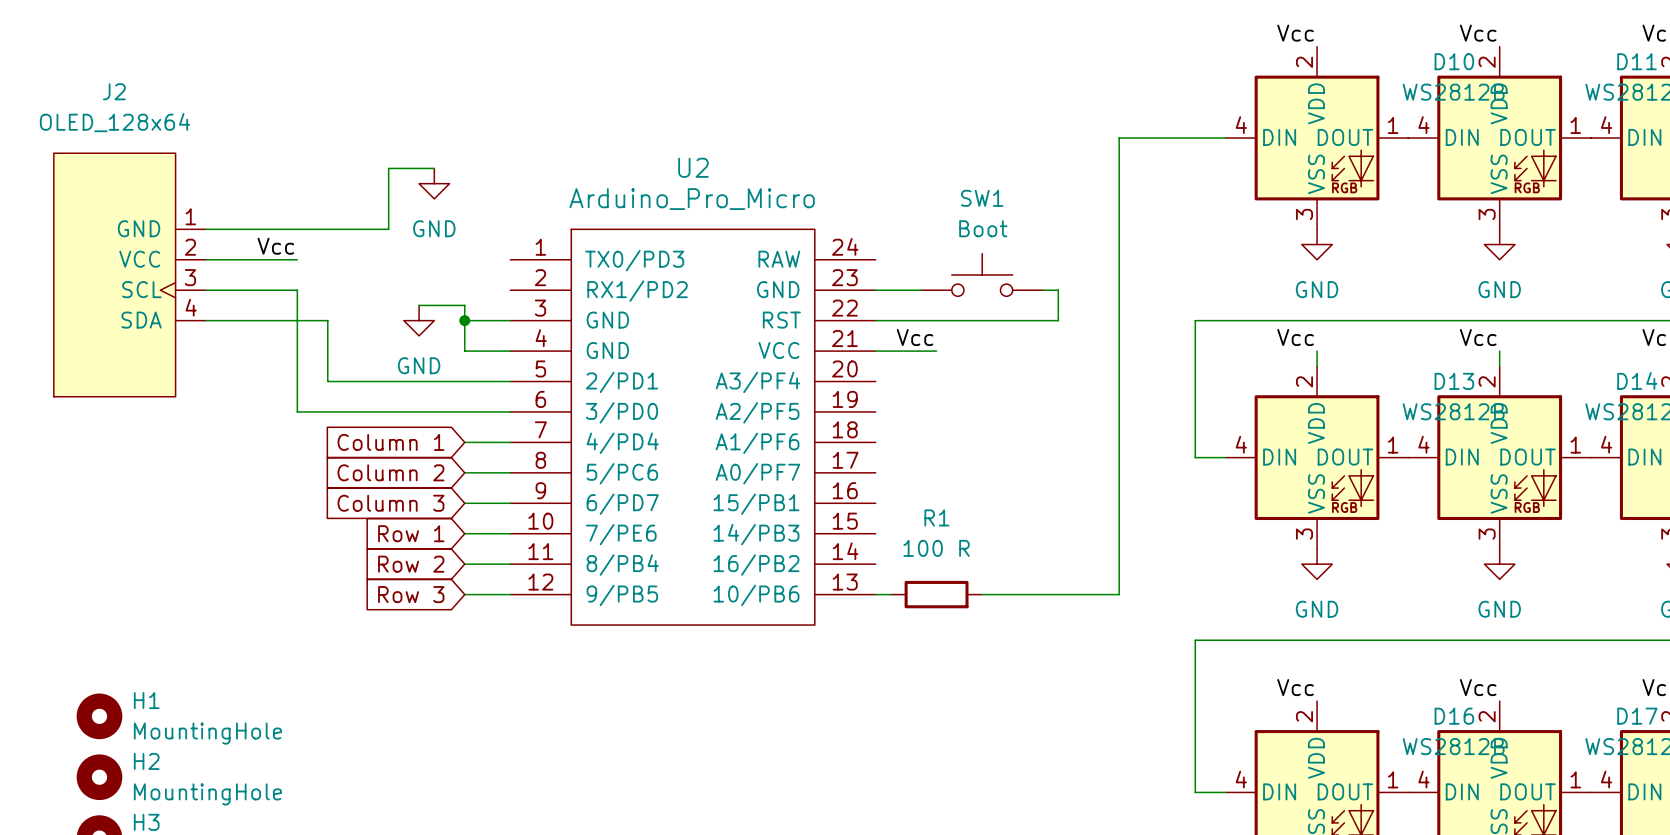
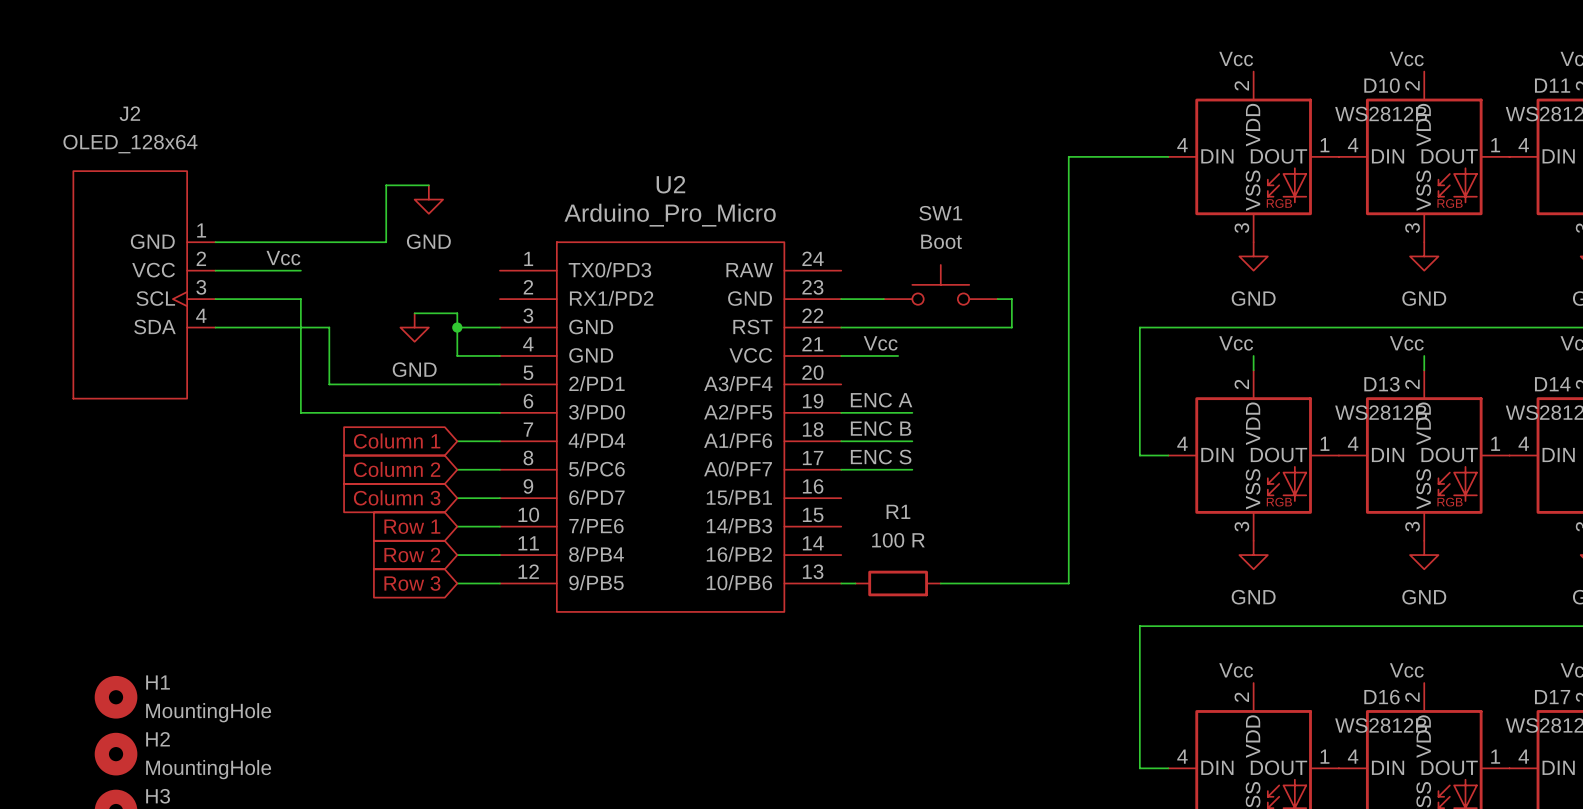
label: none -> ENC A (881, 400)
wire: none -> (841, 412) (912, 412)
label: none -> ENC B (881, 428)
wire: none -> (841, 441) (912, 441)
label: none -> ENC S (881, 457)
wire: none -> (841, 469) (912, 469)

